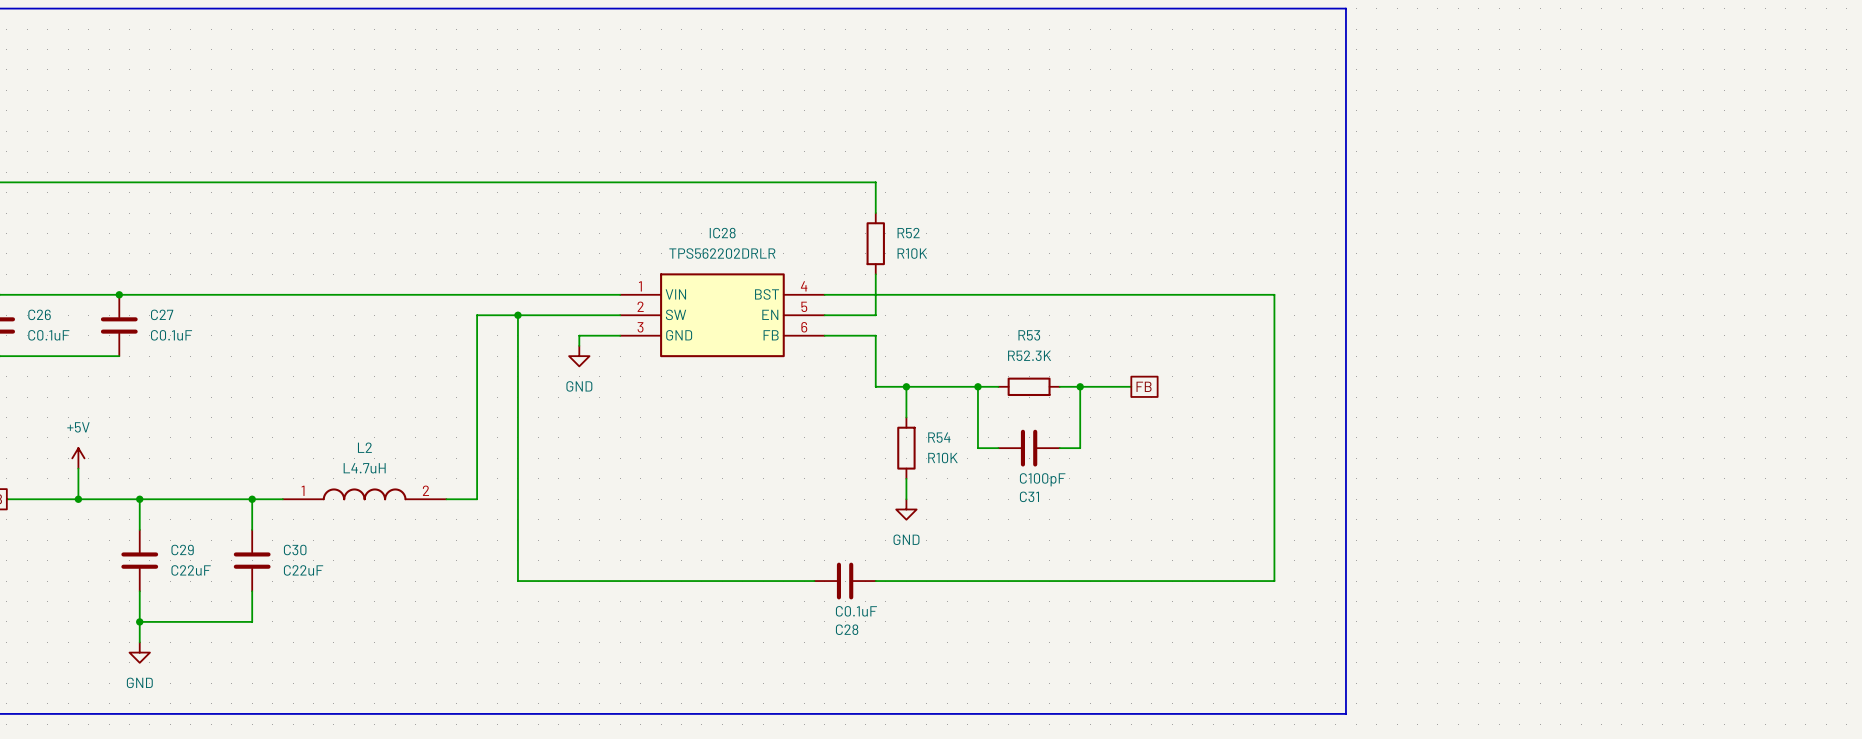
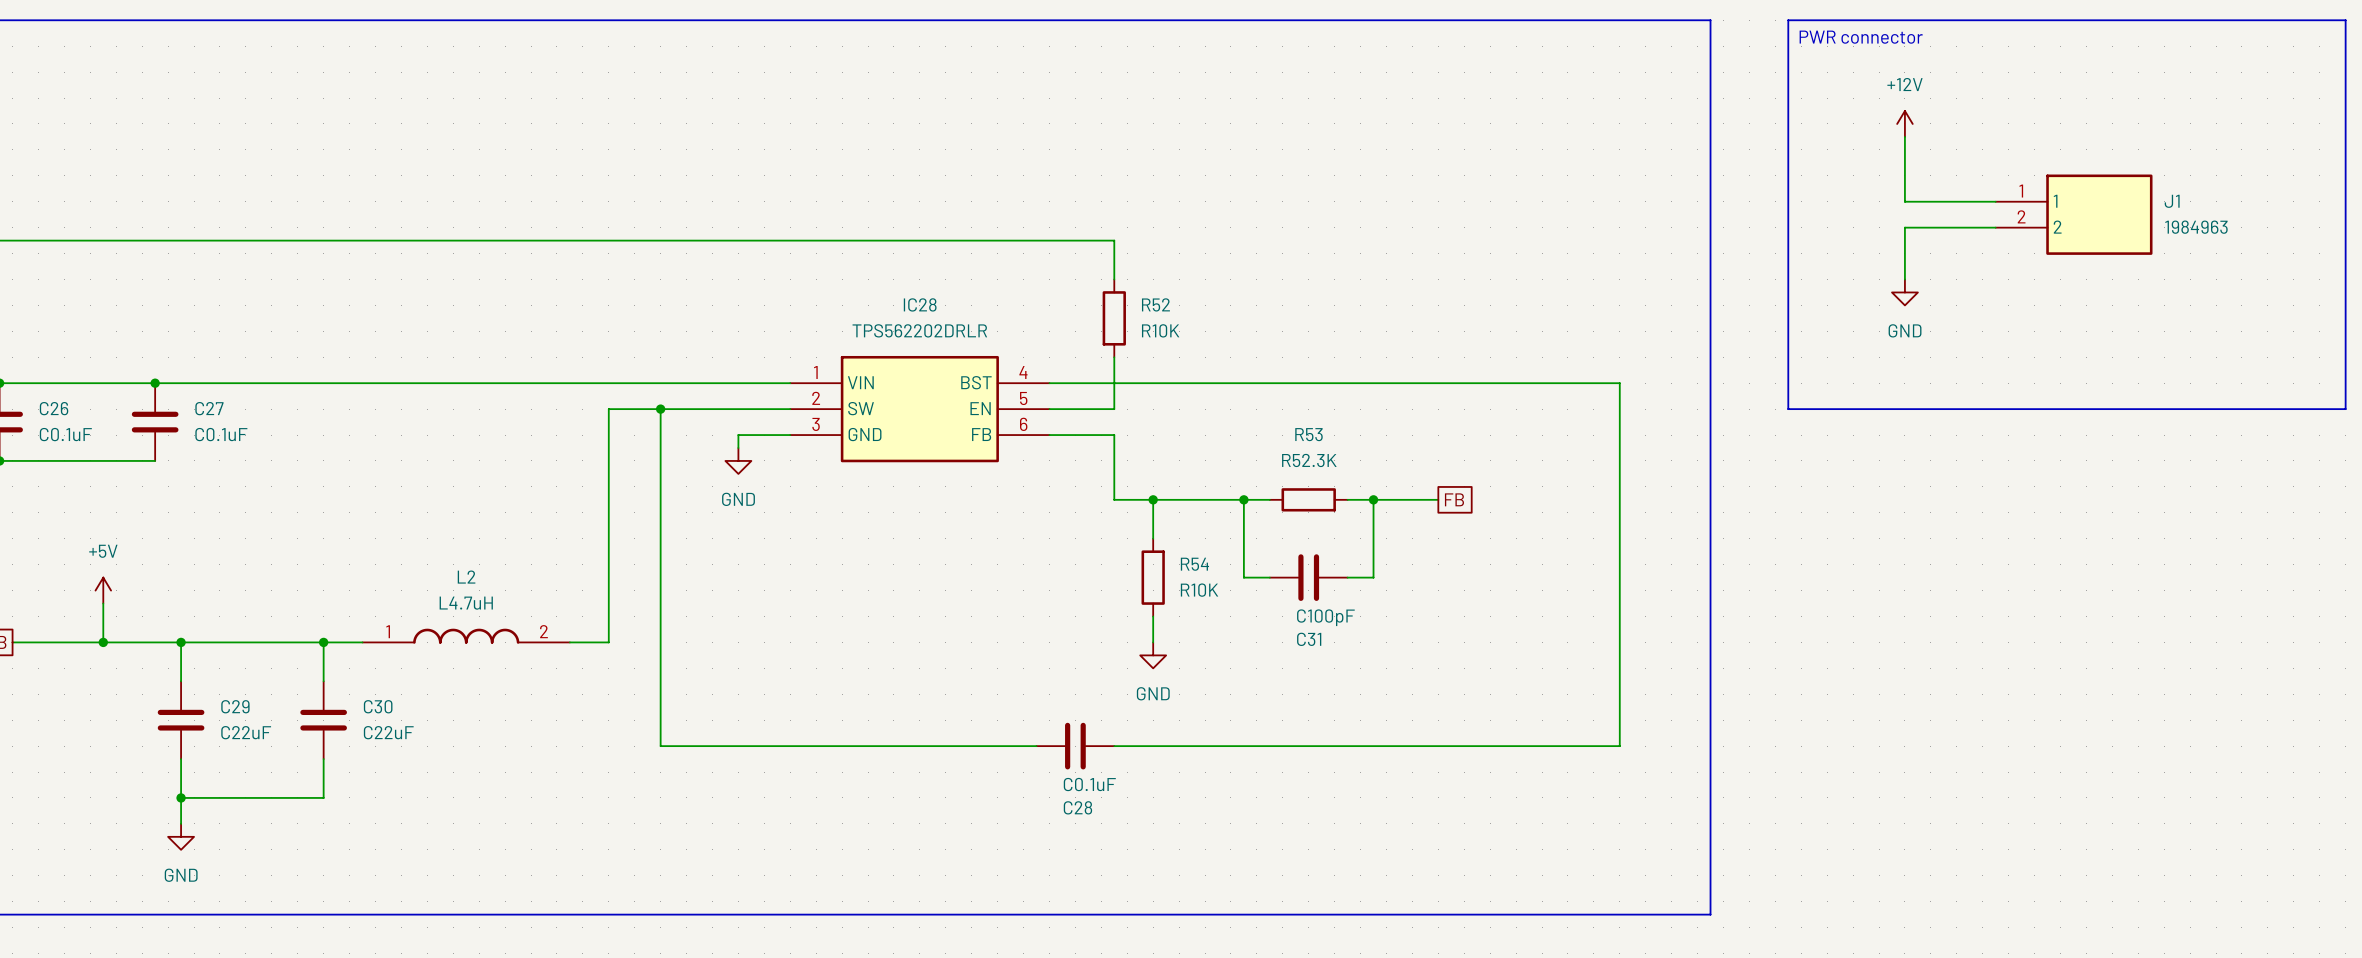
line: none -> (1788, 20) (2345, 20) (2345, 409) (1788, 409) (1788, 20)
text: none -> PWR connector (1861, 37)
power symbol: none -> +12V (1904, 123)
wire: none -> (1904, 136) (1904, 201) (1995, 201)
J1: none -> 1984963 (2074, 214)
wire: none -> (1995, 227) (1904, 227) (1904, 279)
power symbol: none -> GND (1904, 292)

